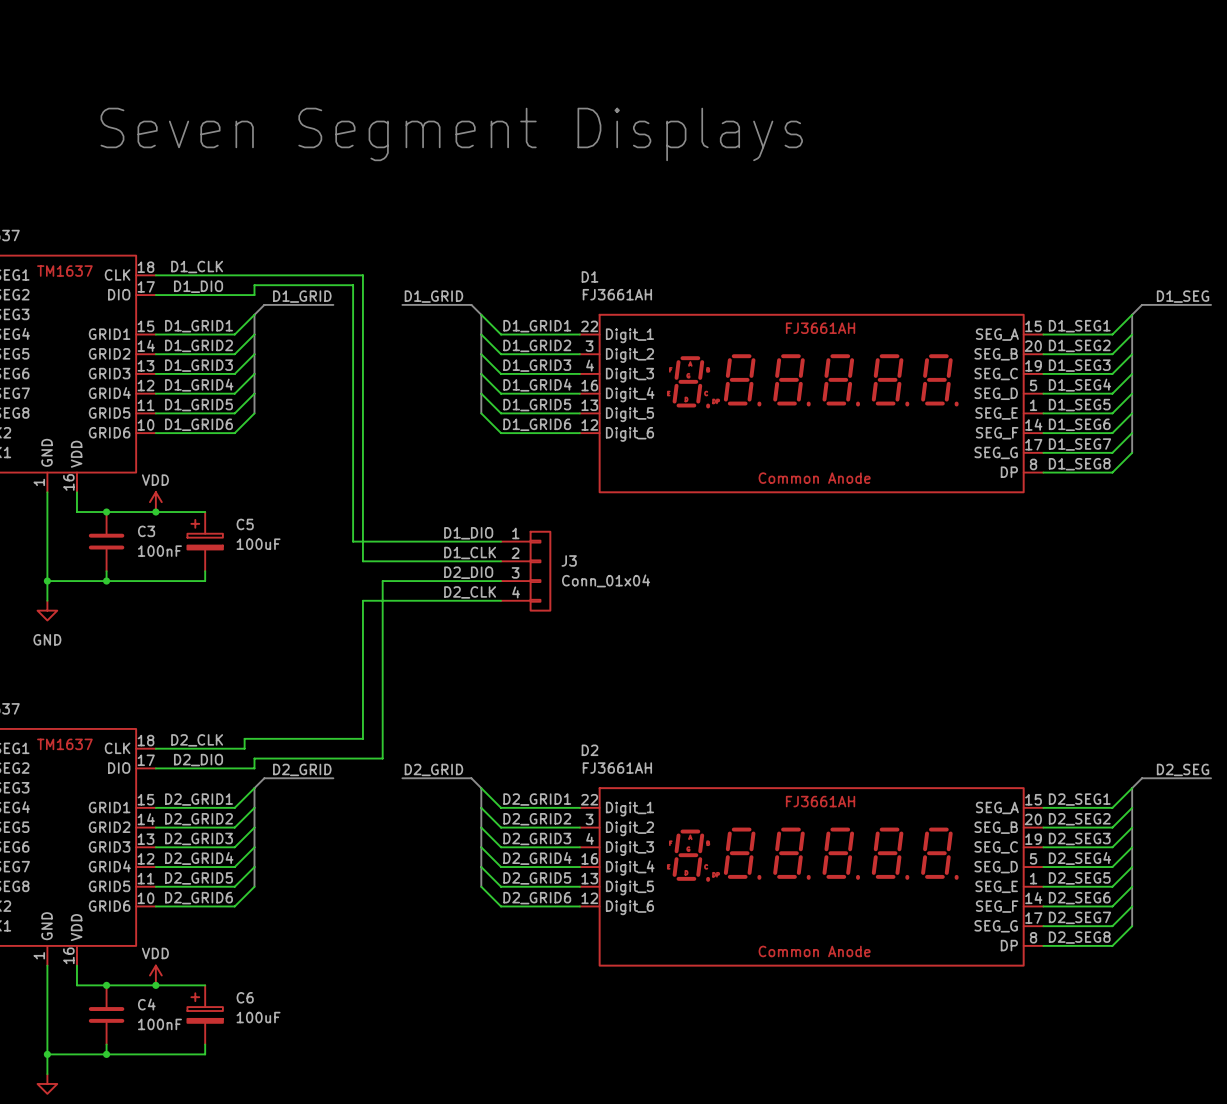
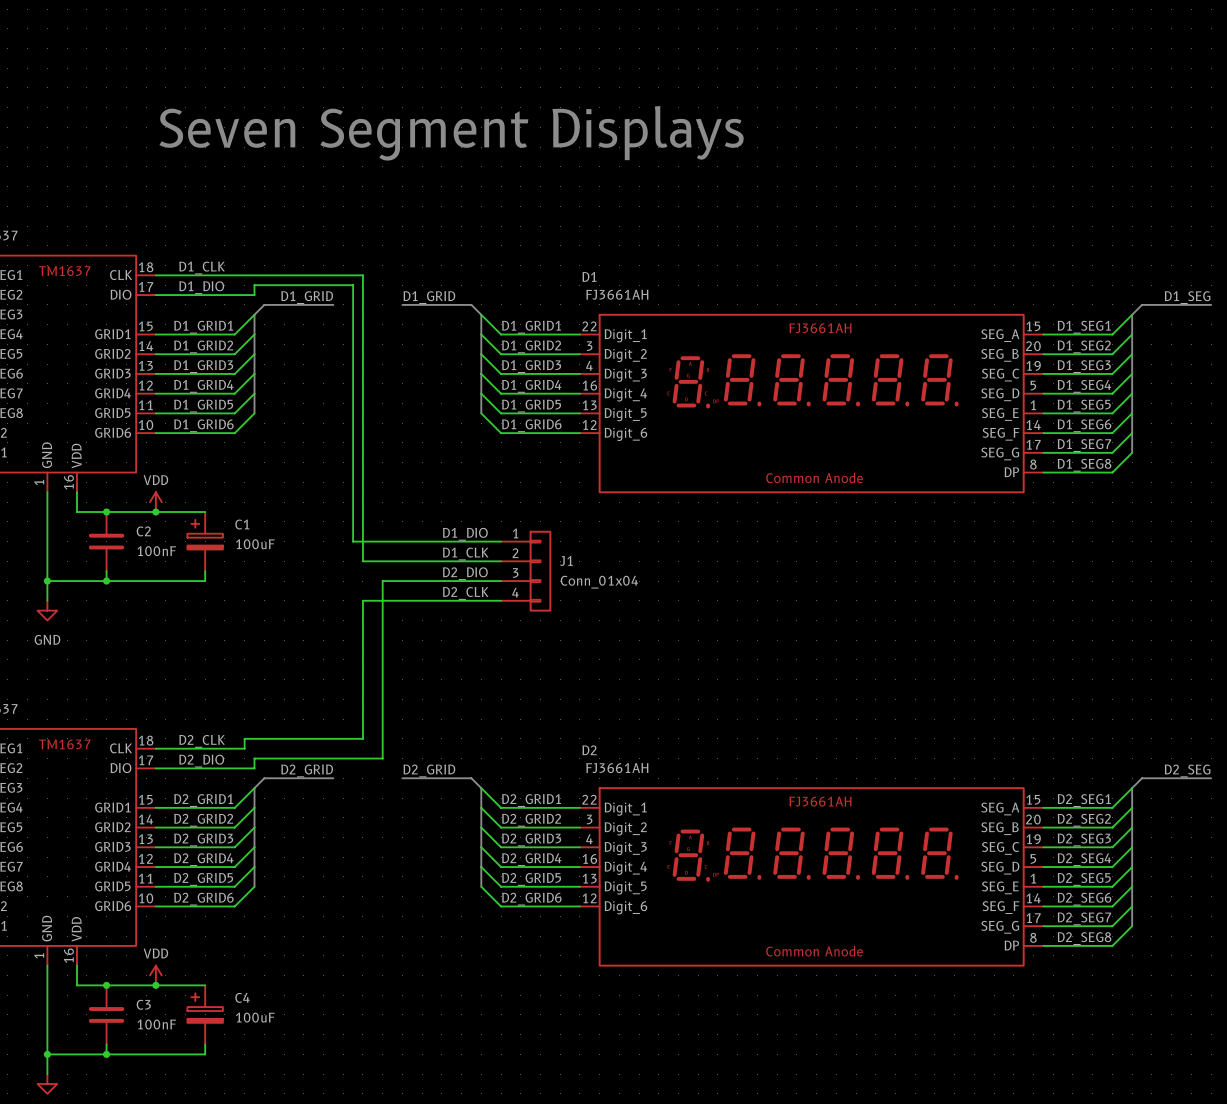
C5 name: C5 (245, 524) -> C1 (242, 524)
C3 name: C3 (146, 531) -> C2 (143, 531)
J3 name: J3 (569, 560) -> J1 (566, 561)
C6 name: C6 (245, 997) -> C4 (242, 997)
C4 name: C4 (146, 1004) -> C3 (143, 1004)

